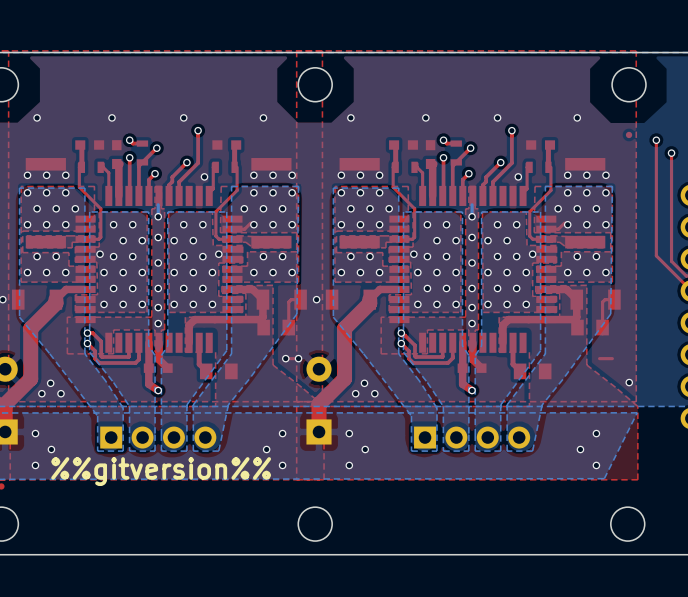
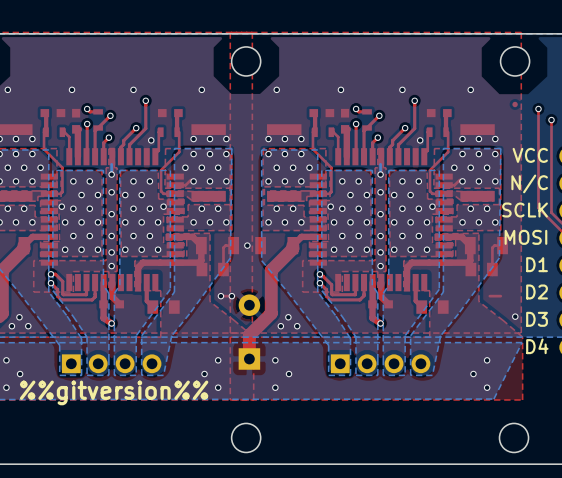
text: none -> VCC (530, 155)
text: none -> N/C (529, 183)
text: none -> SCLK (525, 210)
text: none -> MOSI (525, 237)
text: none -> D1 (537, 264)
text: none -> D2 (537, 291)
text: none -> D3 (537, 319)
text: none -> D4 (537, 346)

